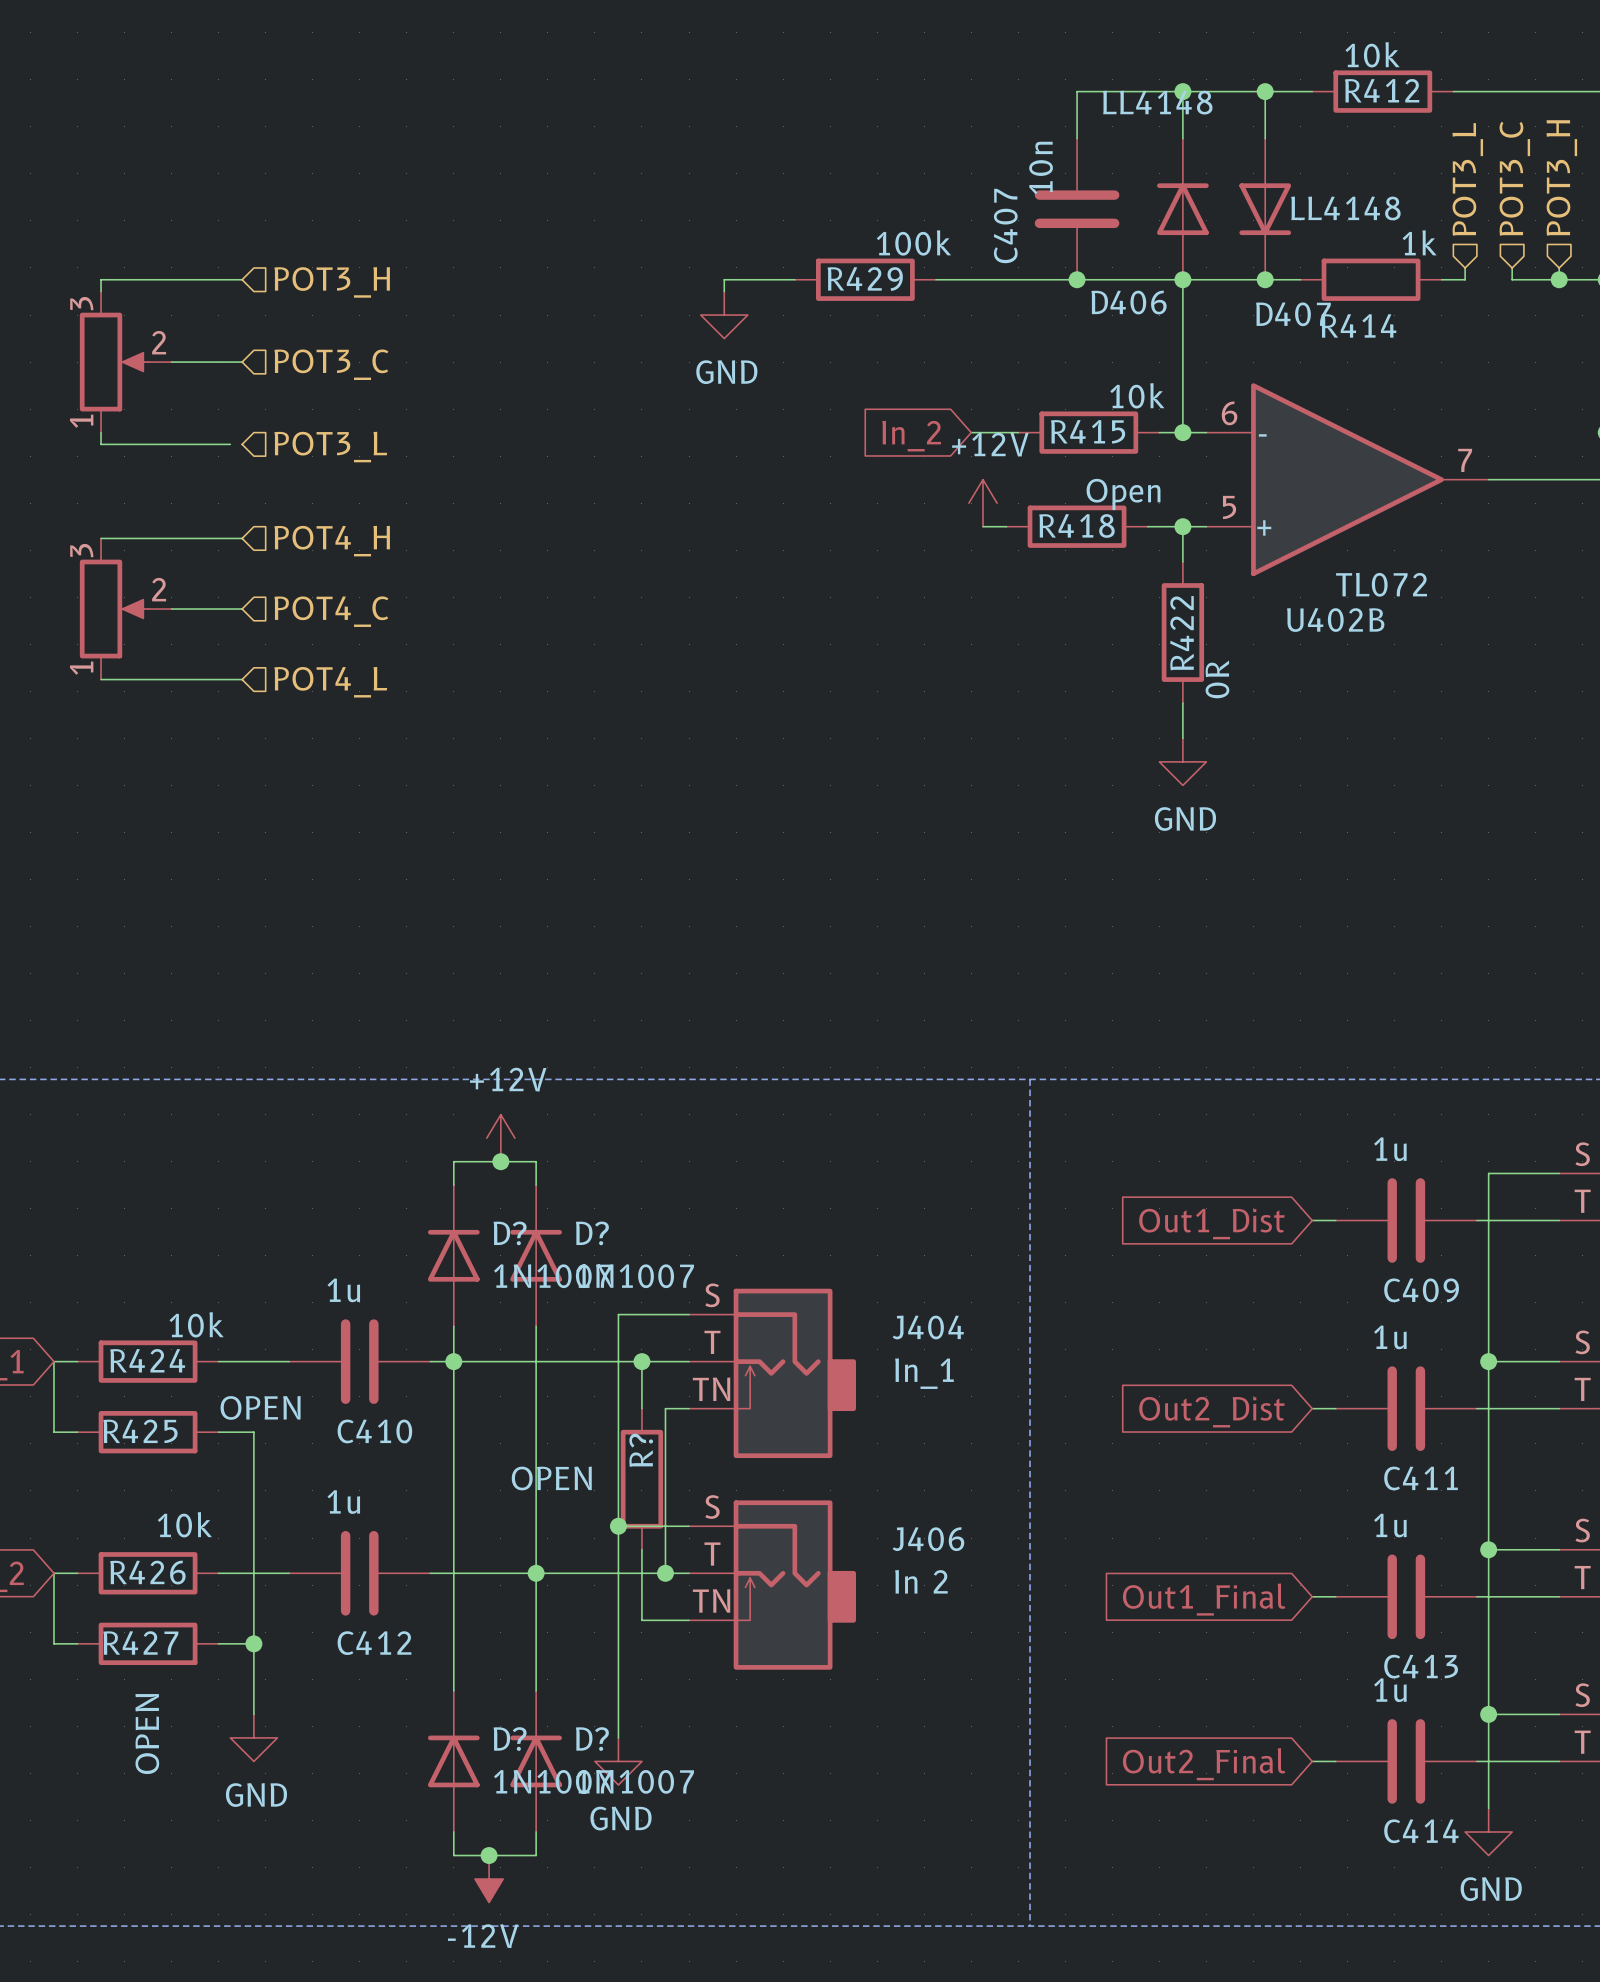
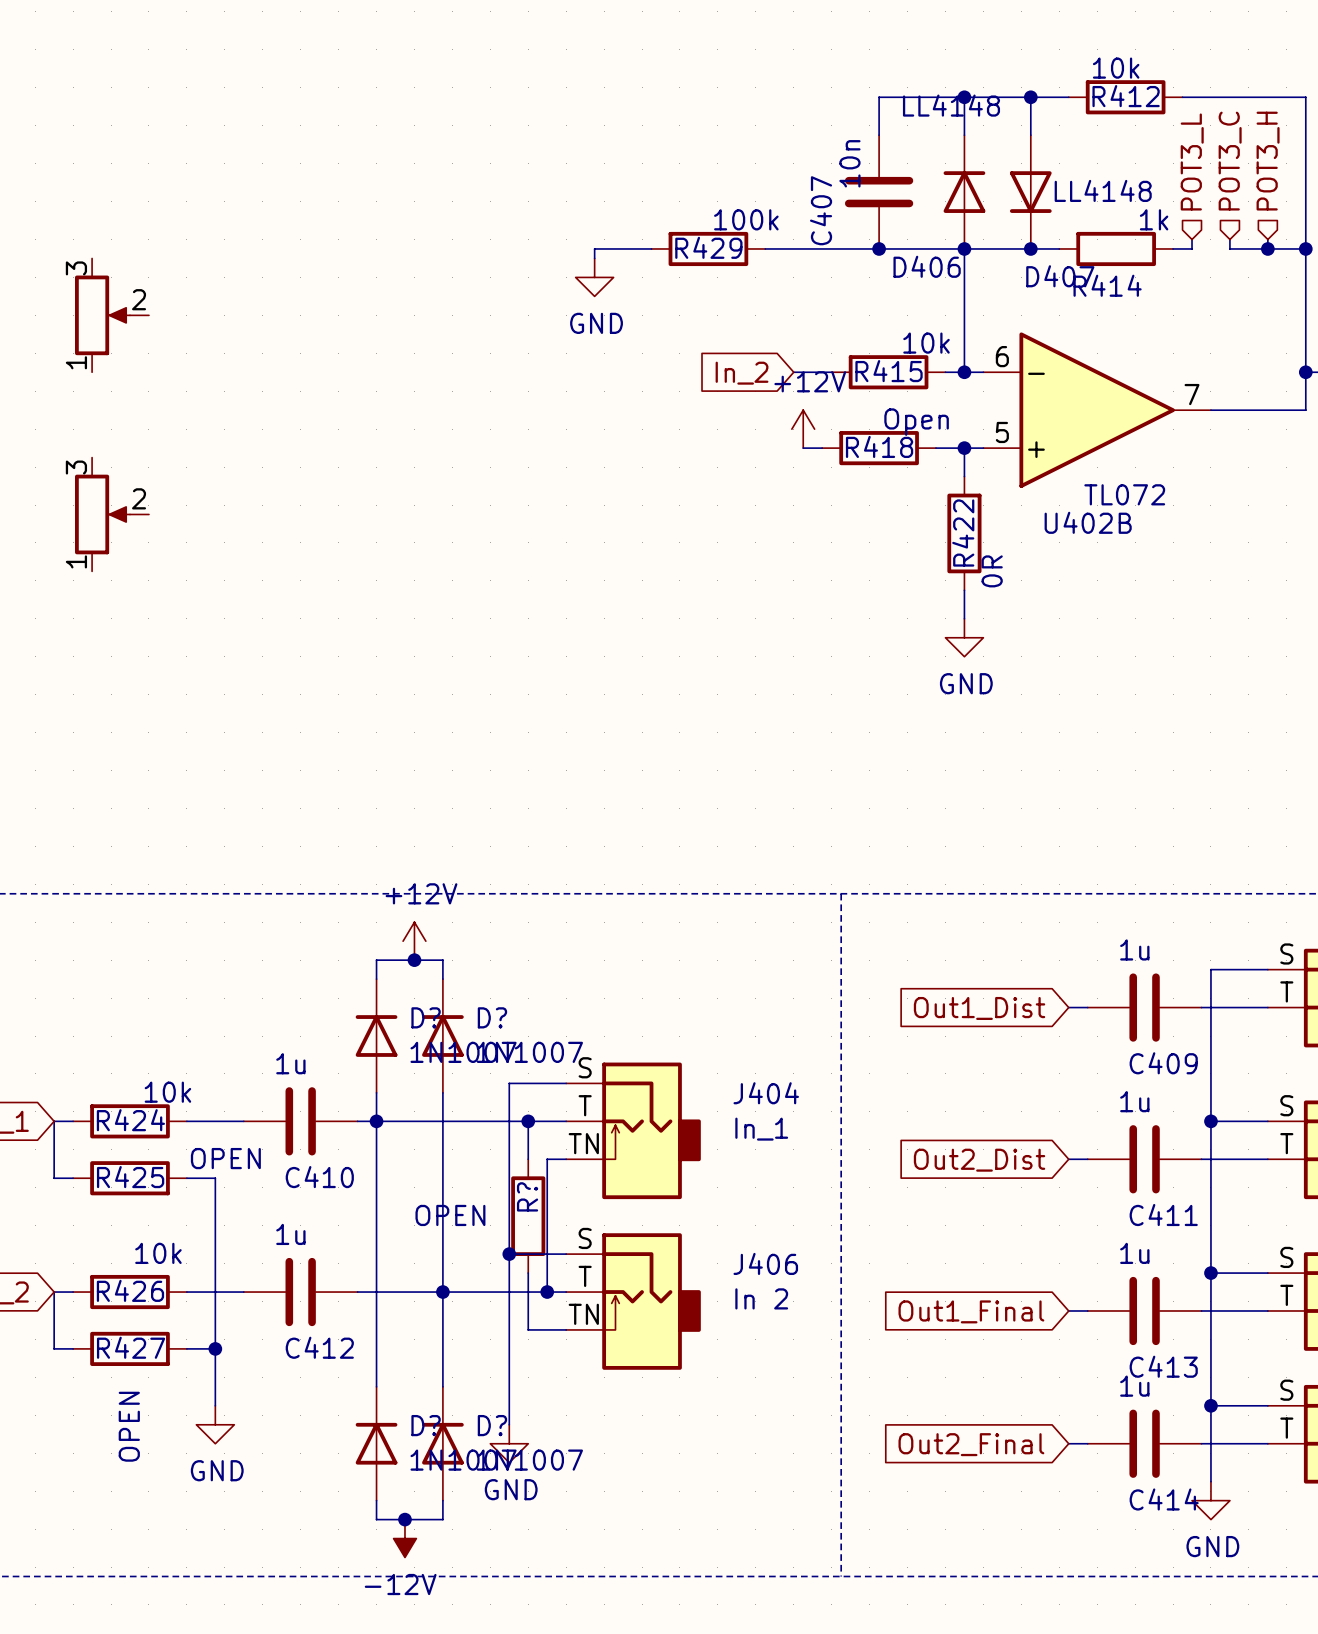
wire: (242, 279) (101, 279) (101, 291) -> none
hierarchical label: POT3_H (332, 282) -> none
wire: (171, 362) (242, 362) -> none
hierarchical label: POT3_C (331, 364) -> none
wire: (101, 432) (101, 444) (230, 444) -> none
hierarchical label: POT3_L (330, 447) -> none
wire: (101, 538) (242, 538) -> none
hierarchical label: POT4_H (332, 541) -> none
wire: (171, 609) (242, 609) -> none
hierarchical label: POT4_C (331, 611) -> none
wire: (101, 679) (242, 679) -> none
hierarchical label: POT4_L (330, 682) -> none

